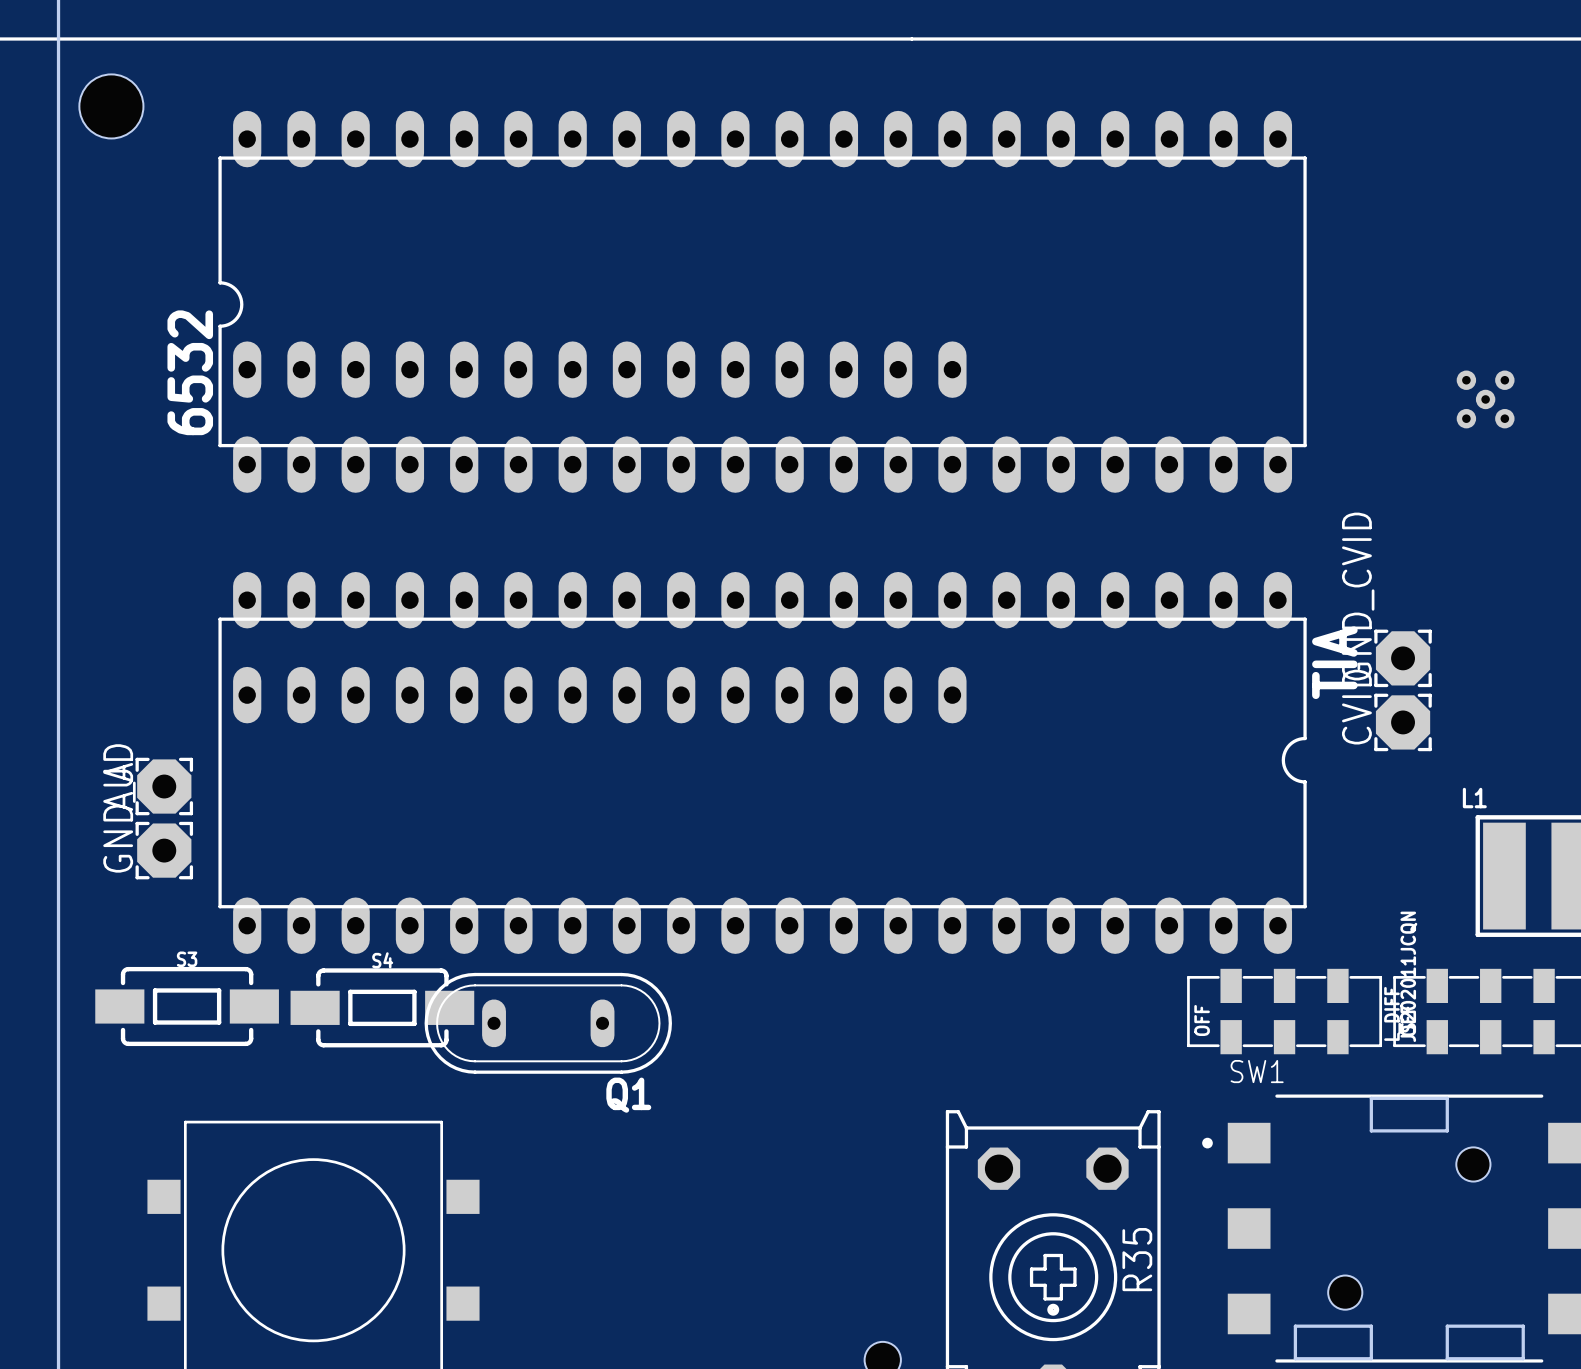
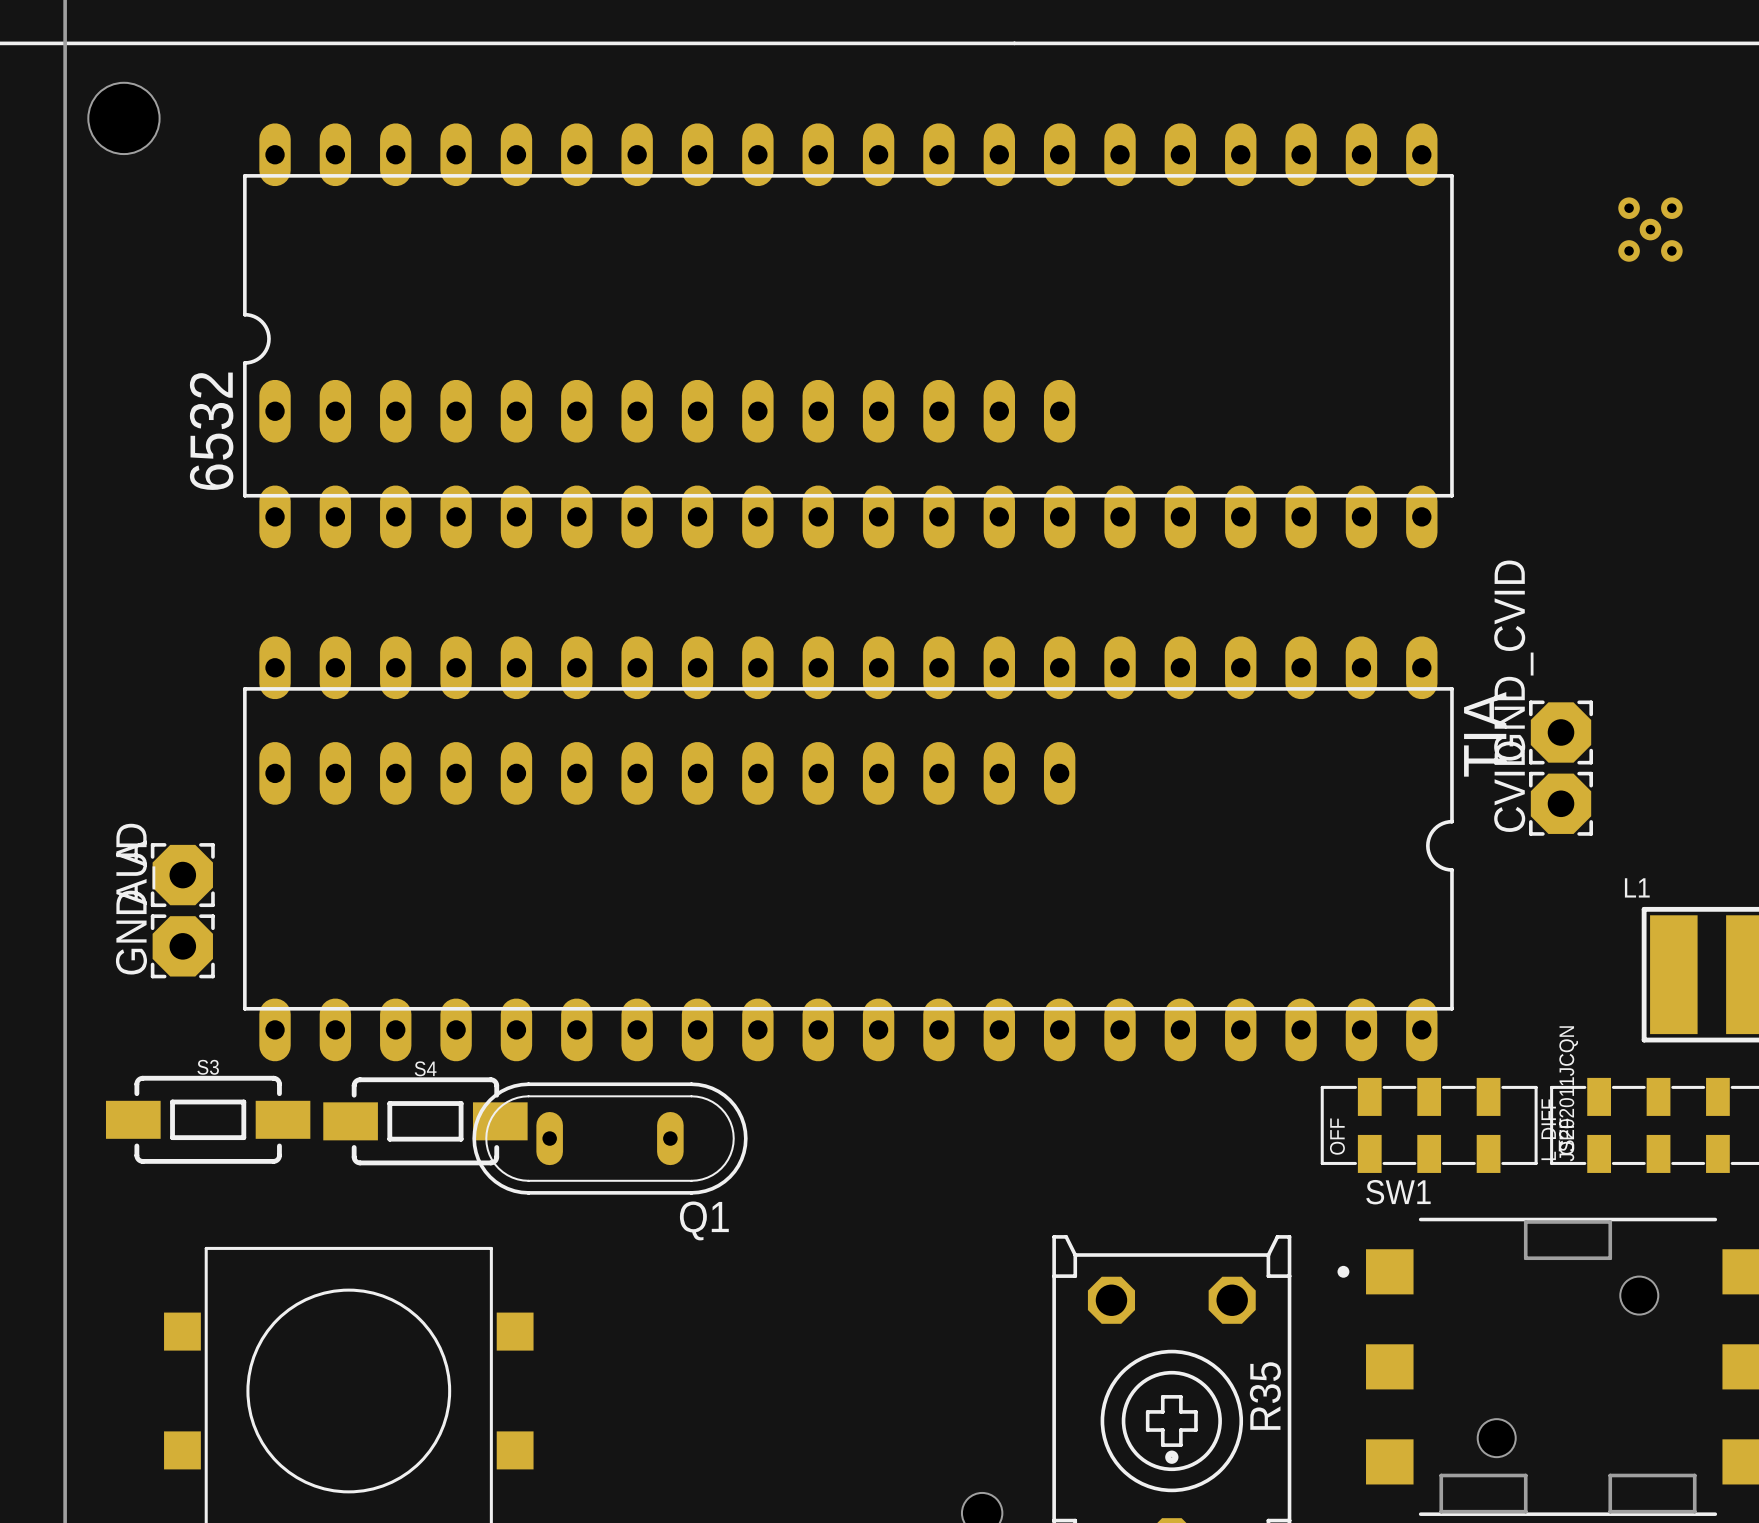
part position: (1485, 399) -> (1650, 229)

